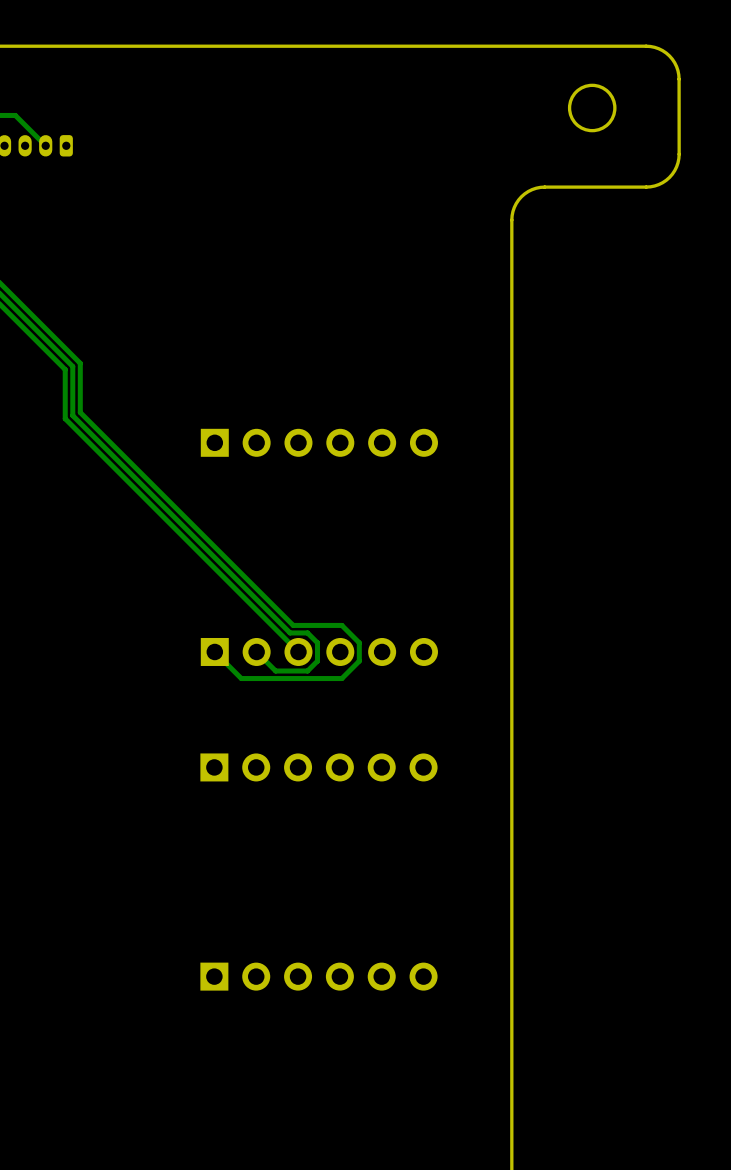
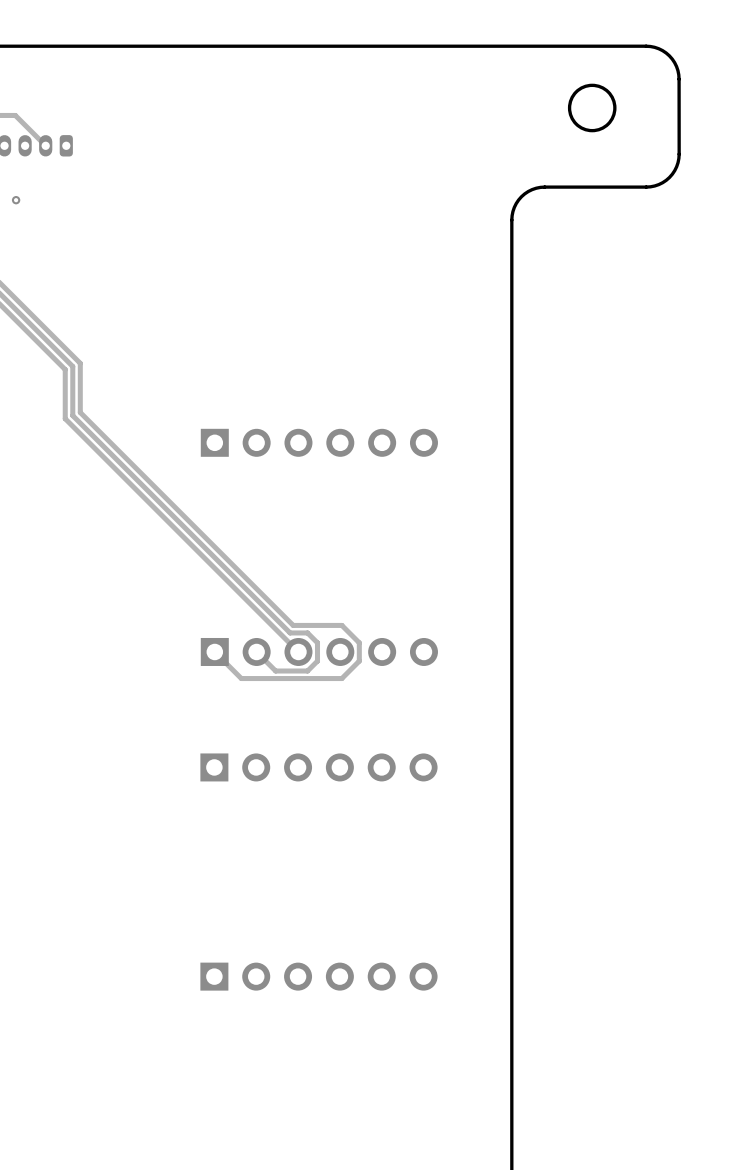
via: none -> (16, 200)

